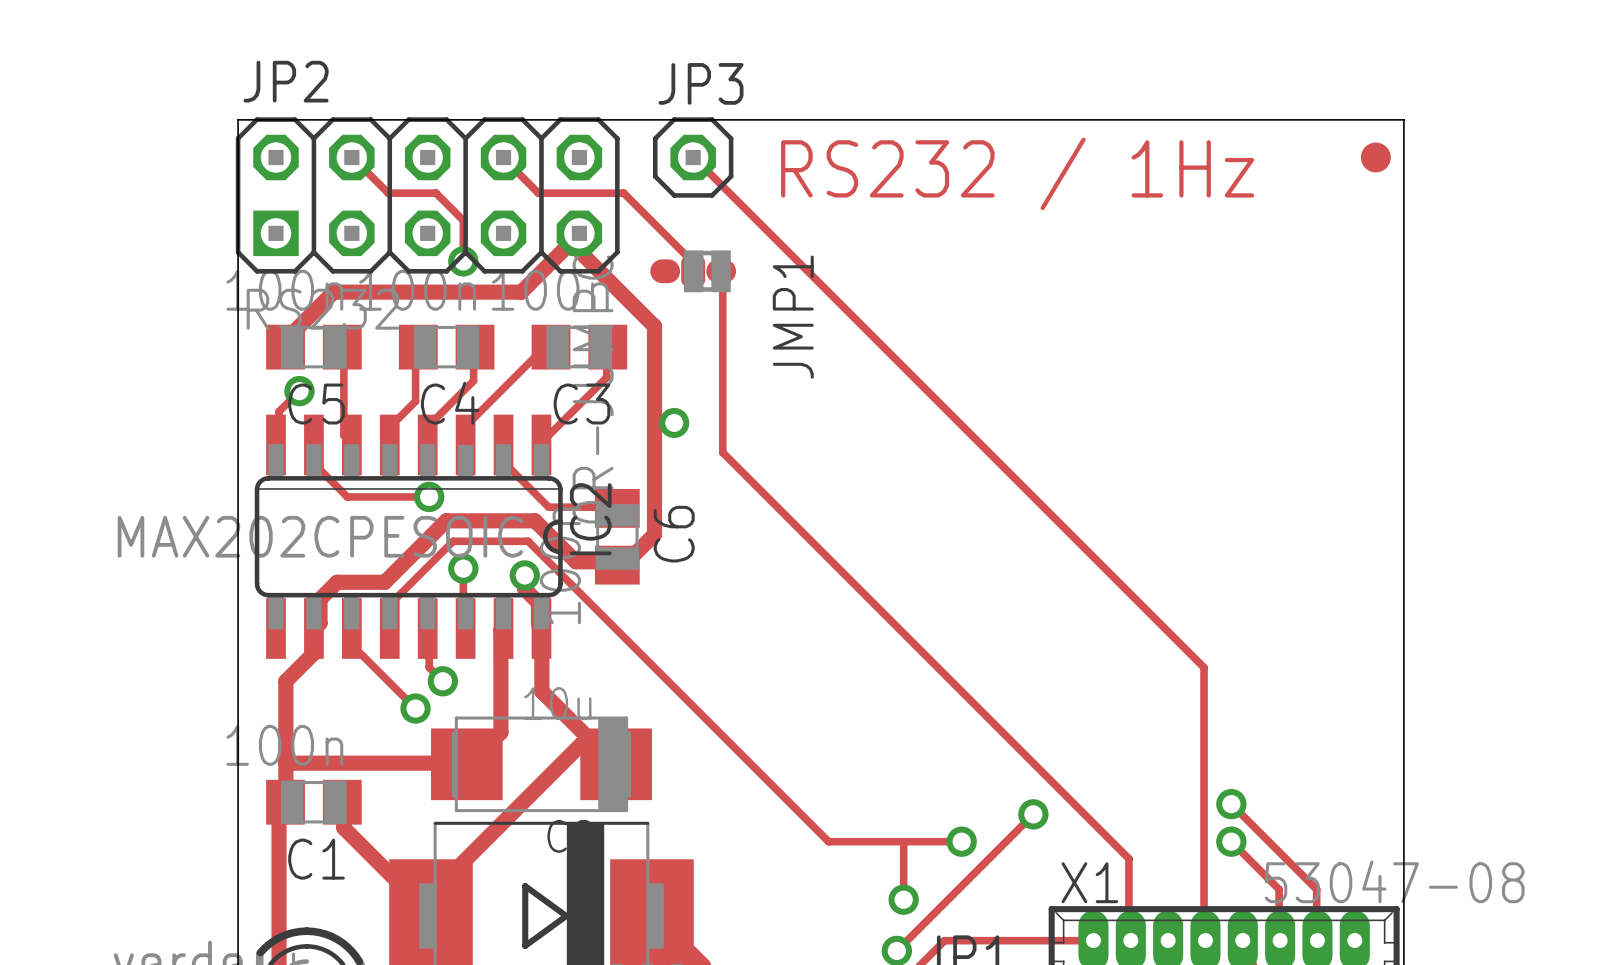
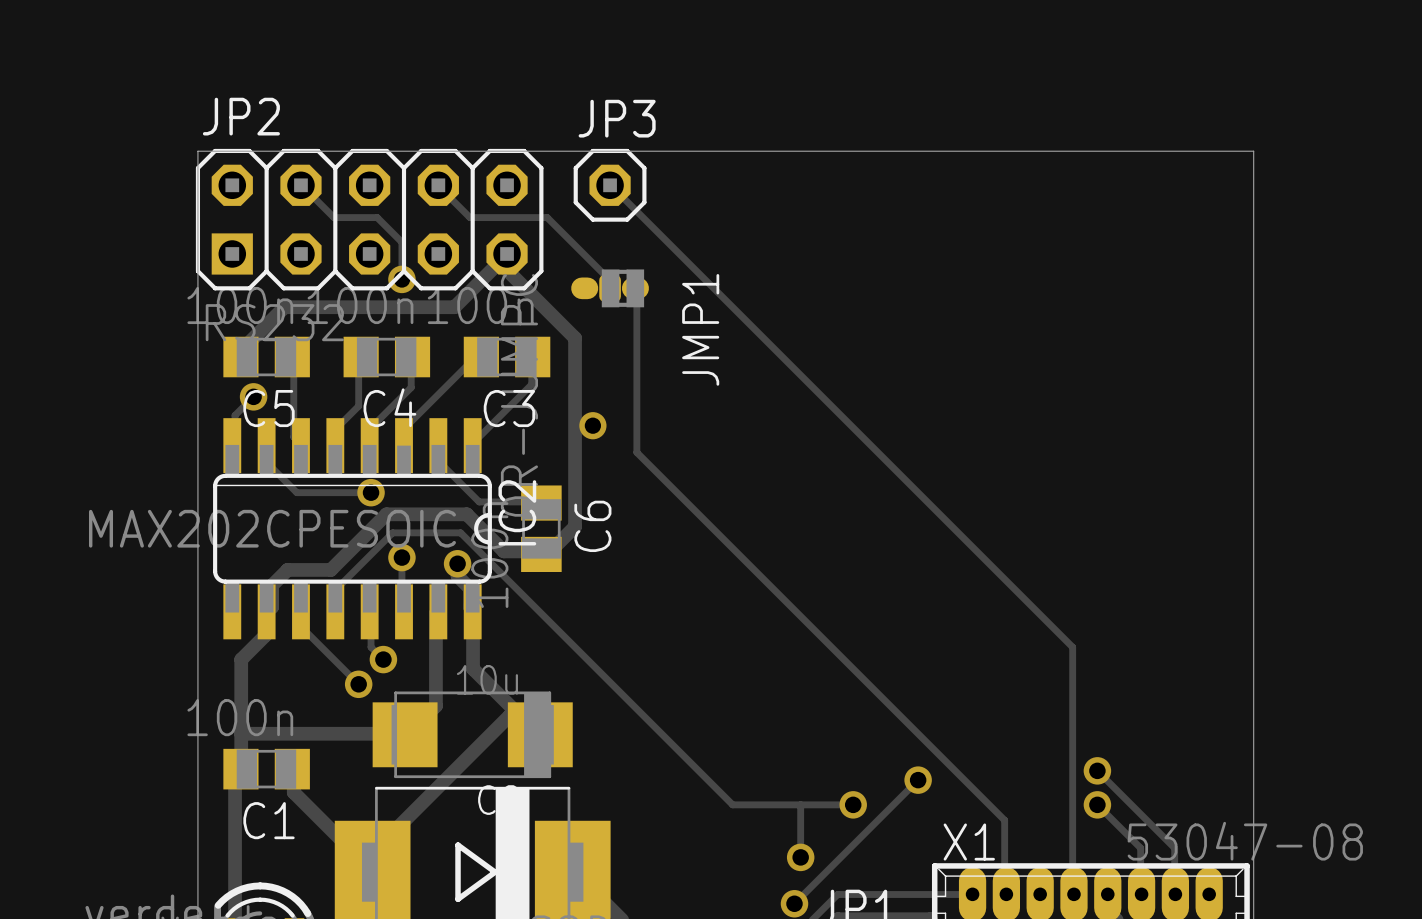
part: (1375, 157) -> none
text: RS232 / 1Hz (1017, 173) -> none

